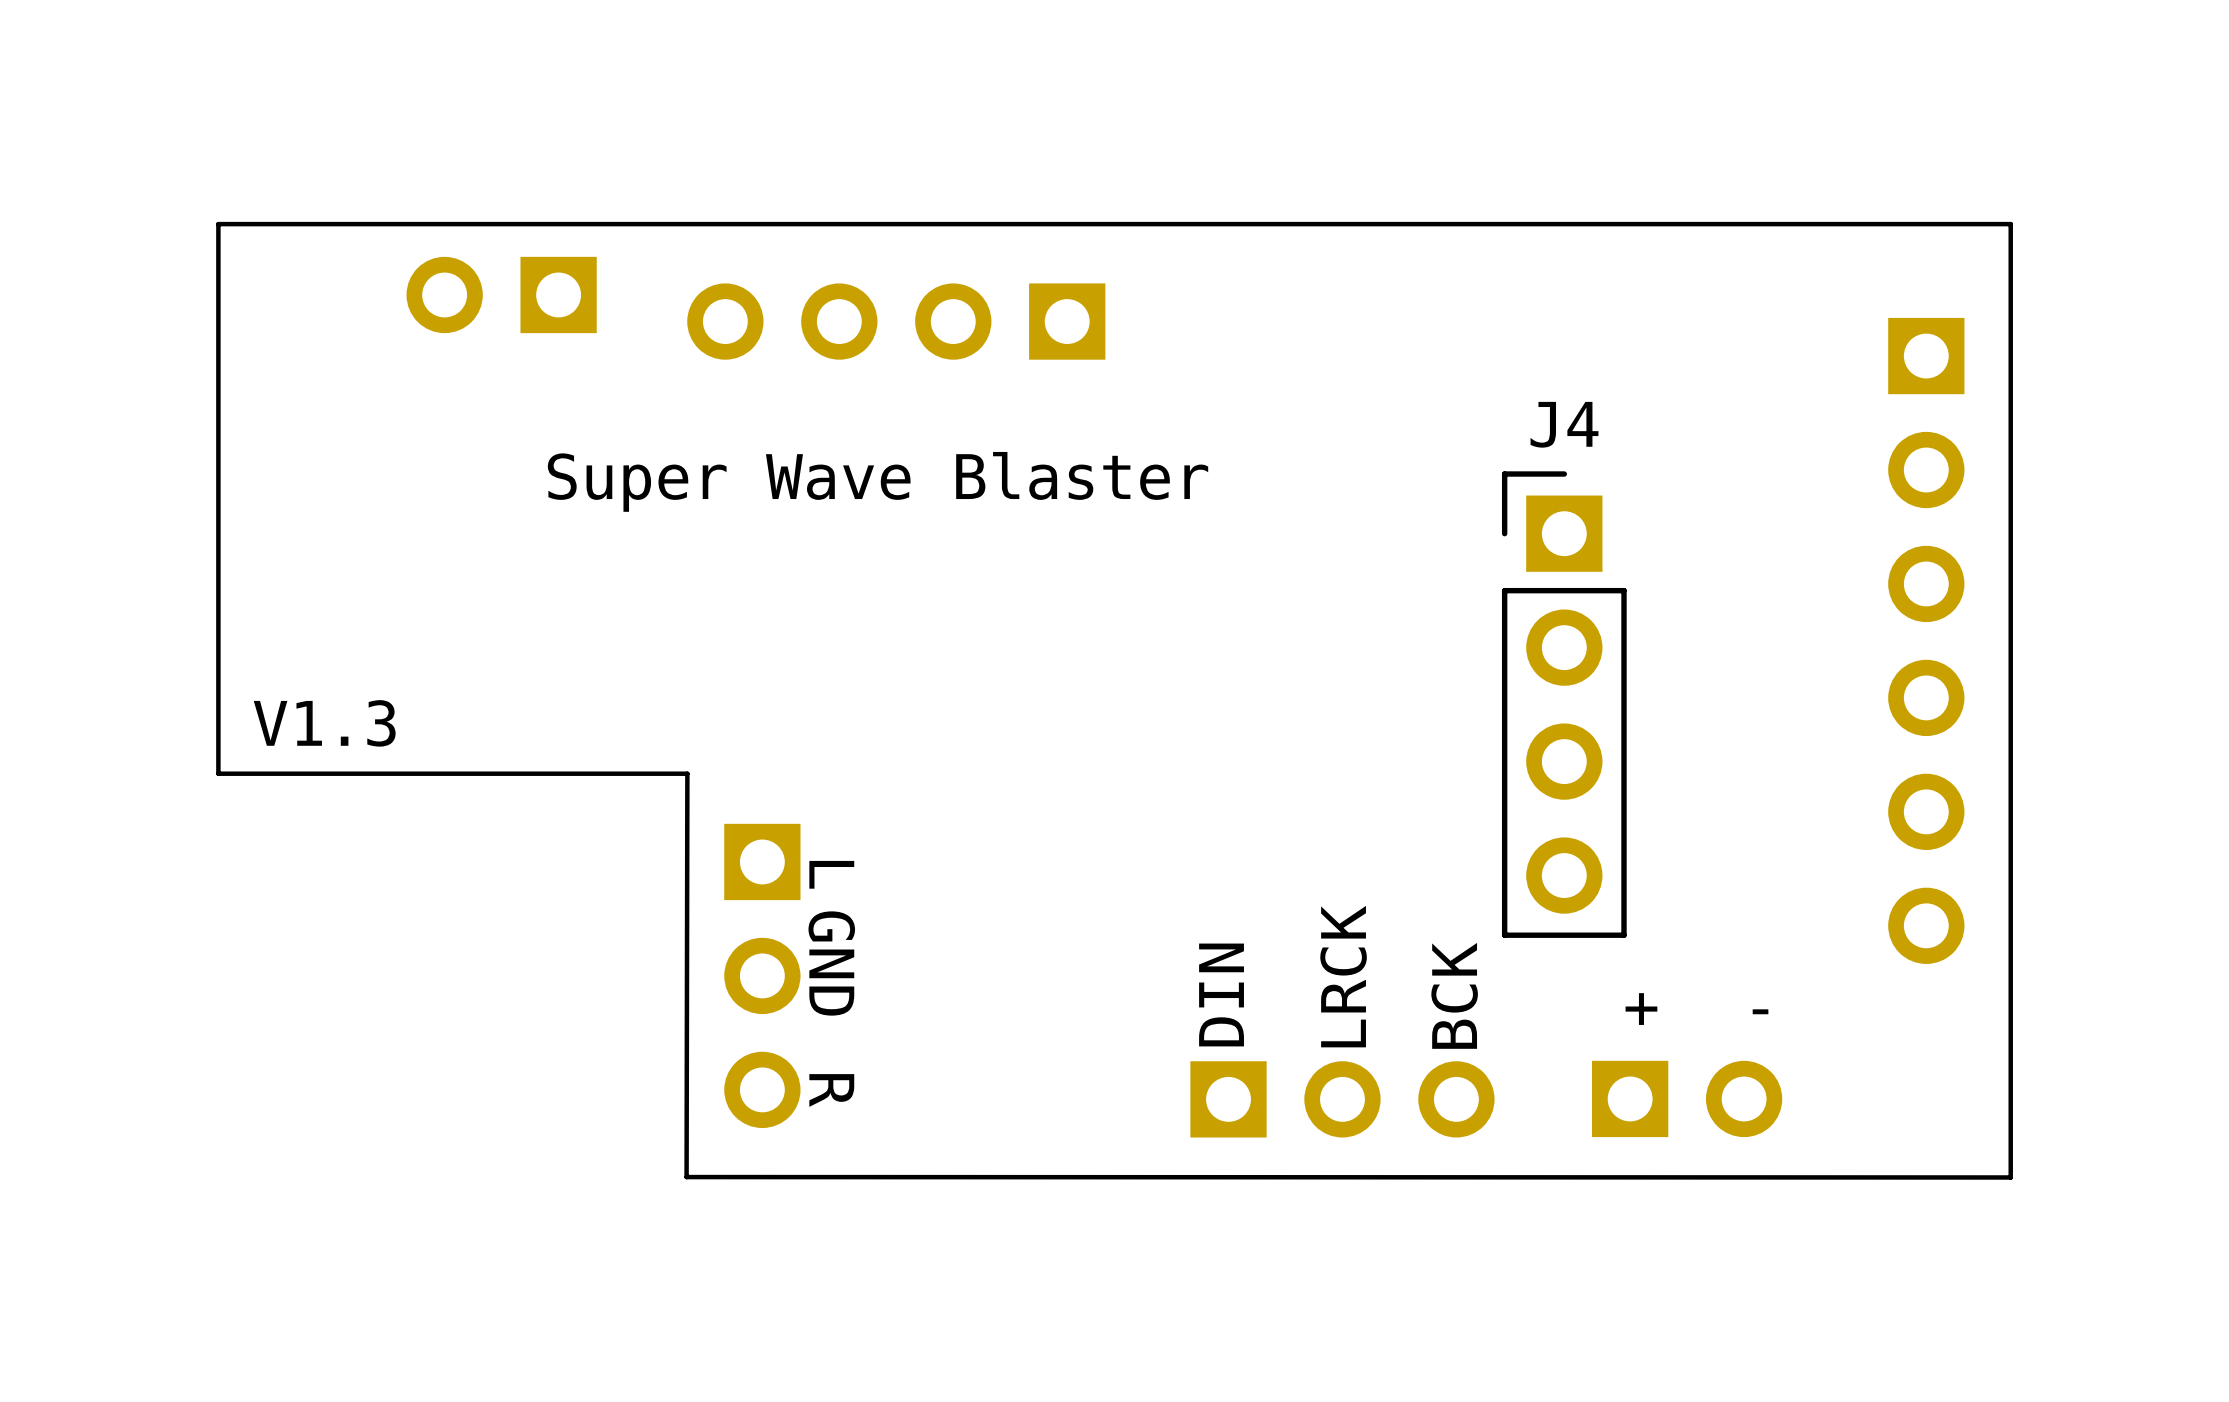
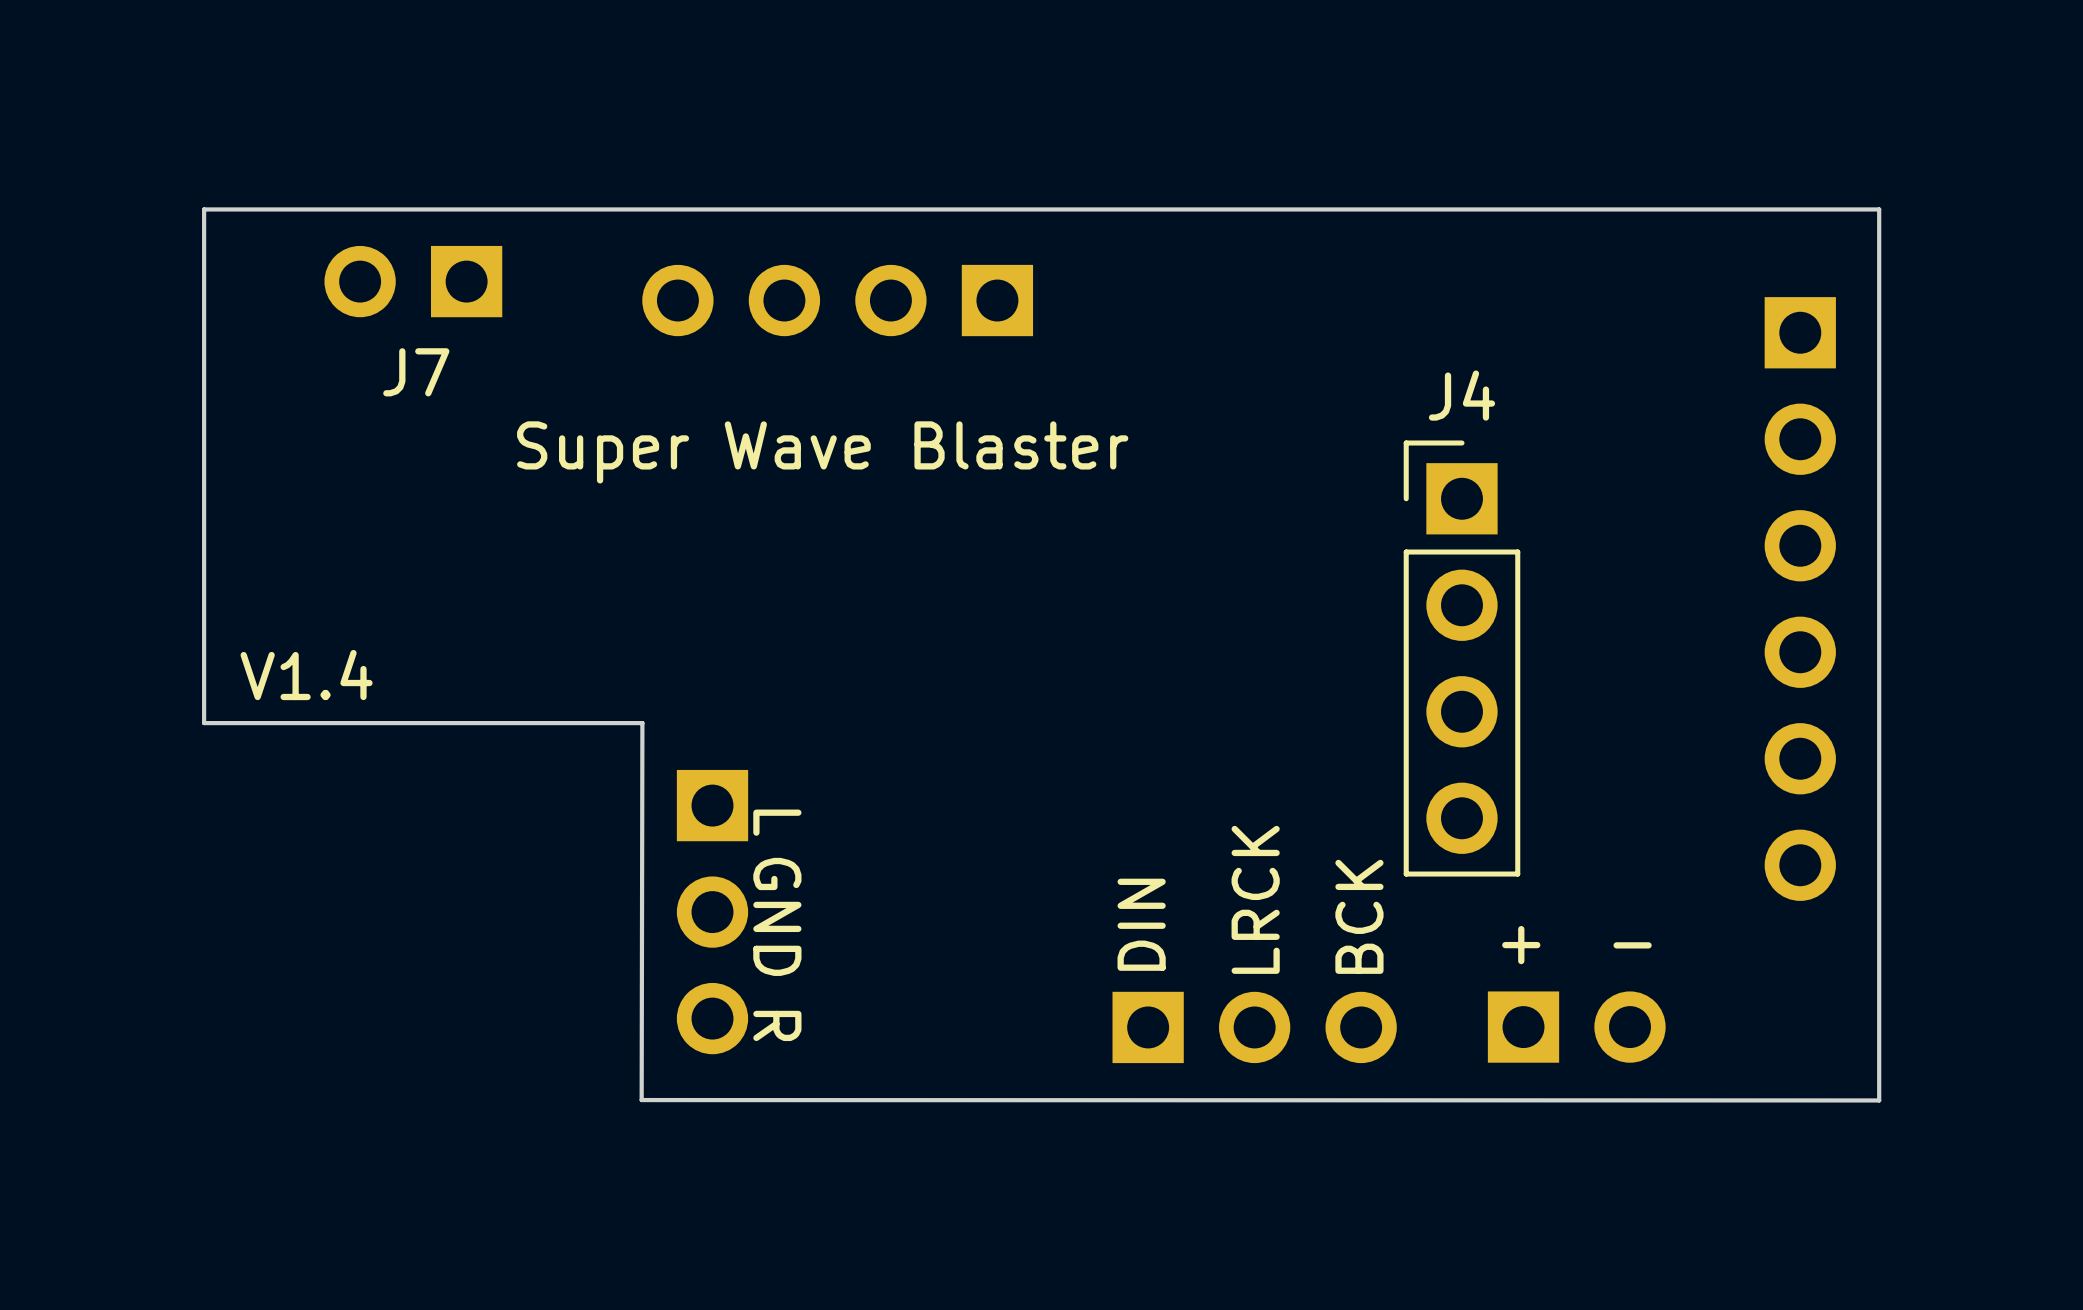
part: (501, 294) -> none
J7: none -> (413, 281)
text: V1.3 (324, 723) -> V1.4 (306, 675)

